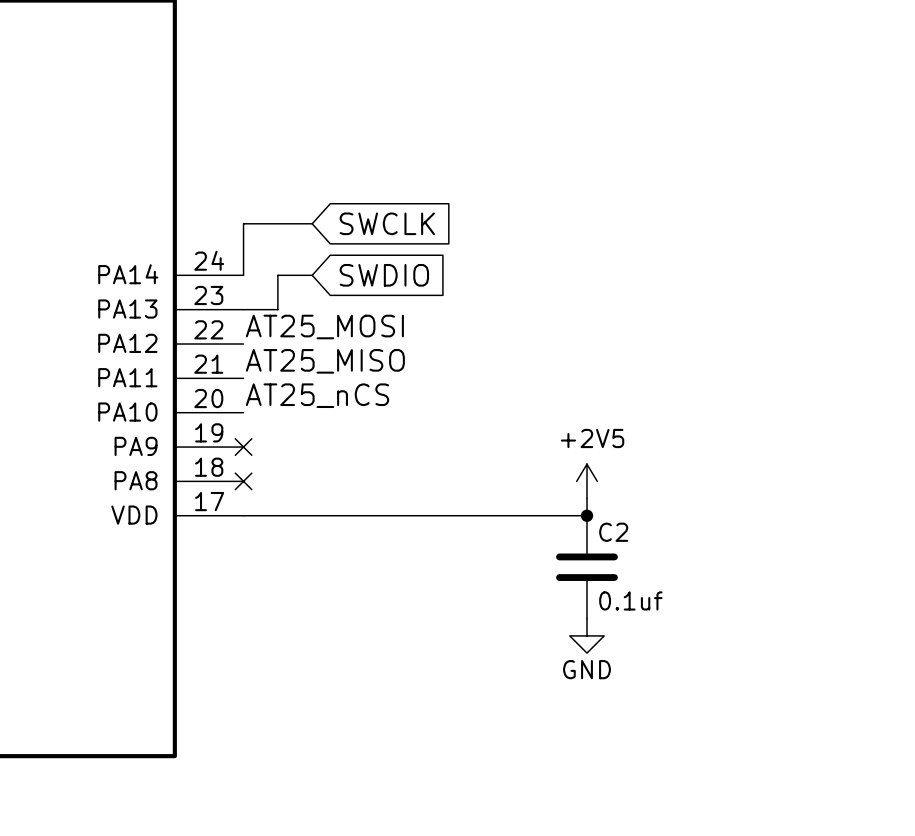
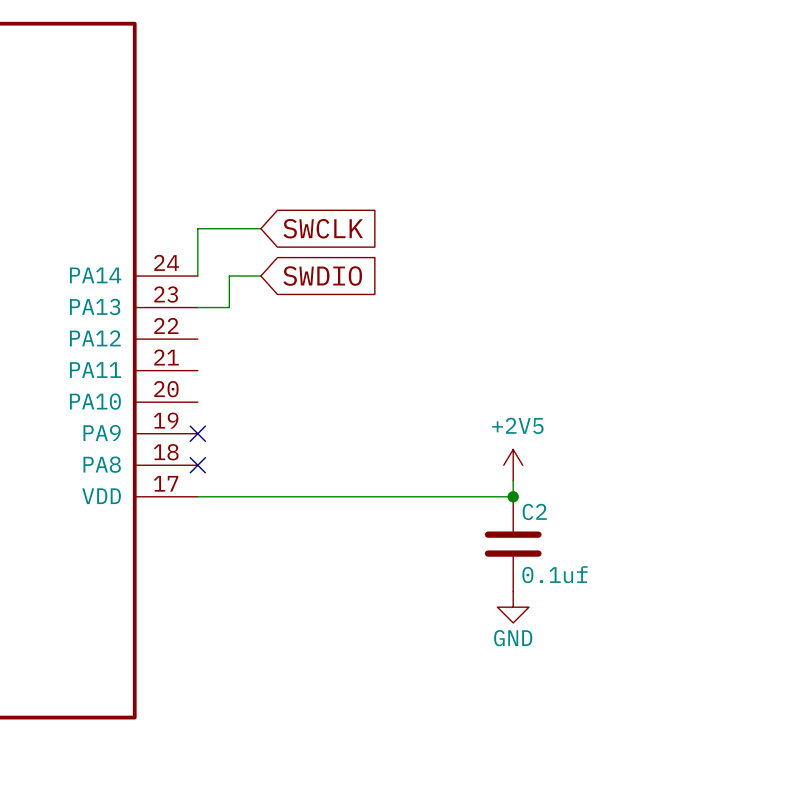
label: AT25_MOSI (324, 327) -> none
label: AT25_MISO (325, 361) -> none
label: AT25_nCS (317, 395) -> none

